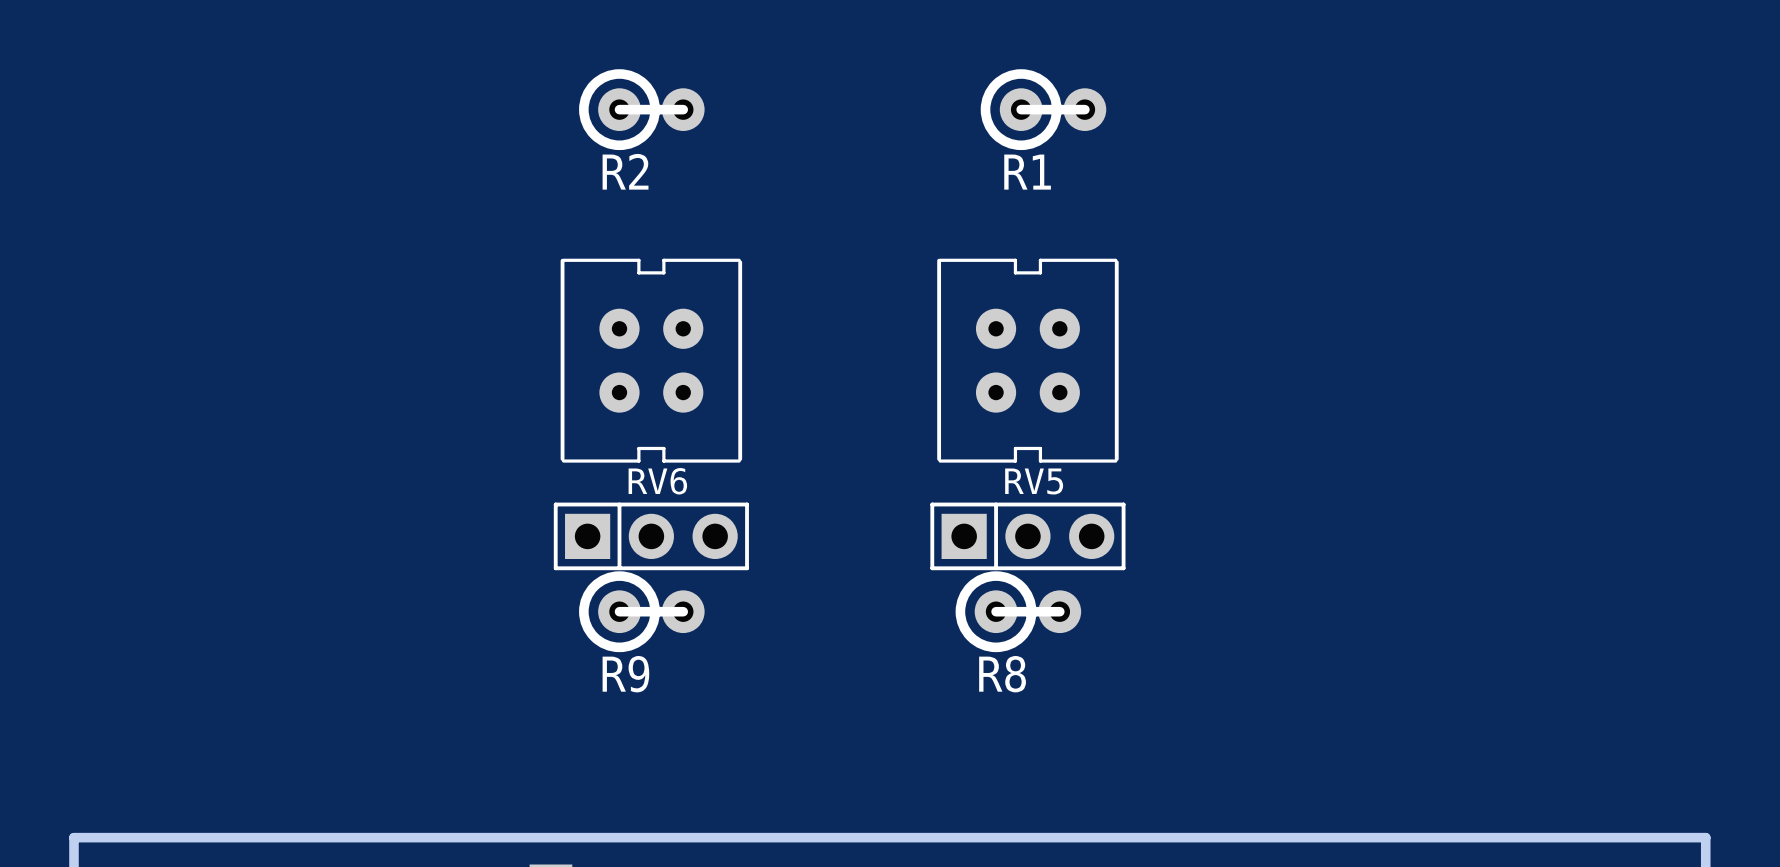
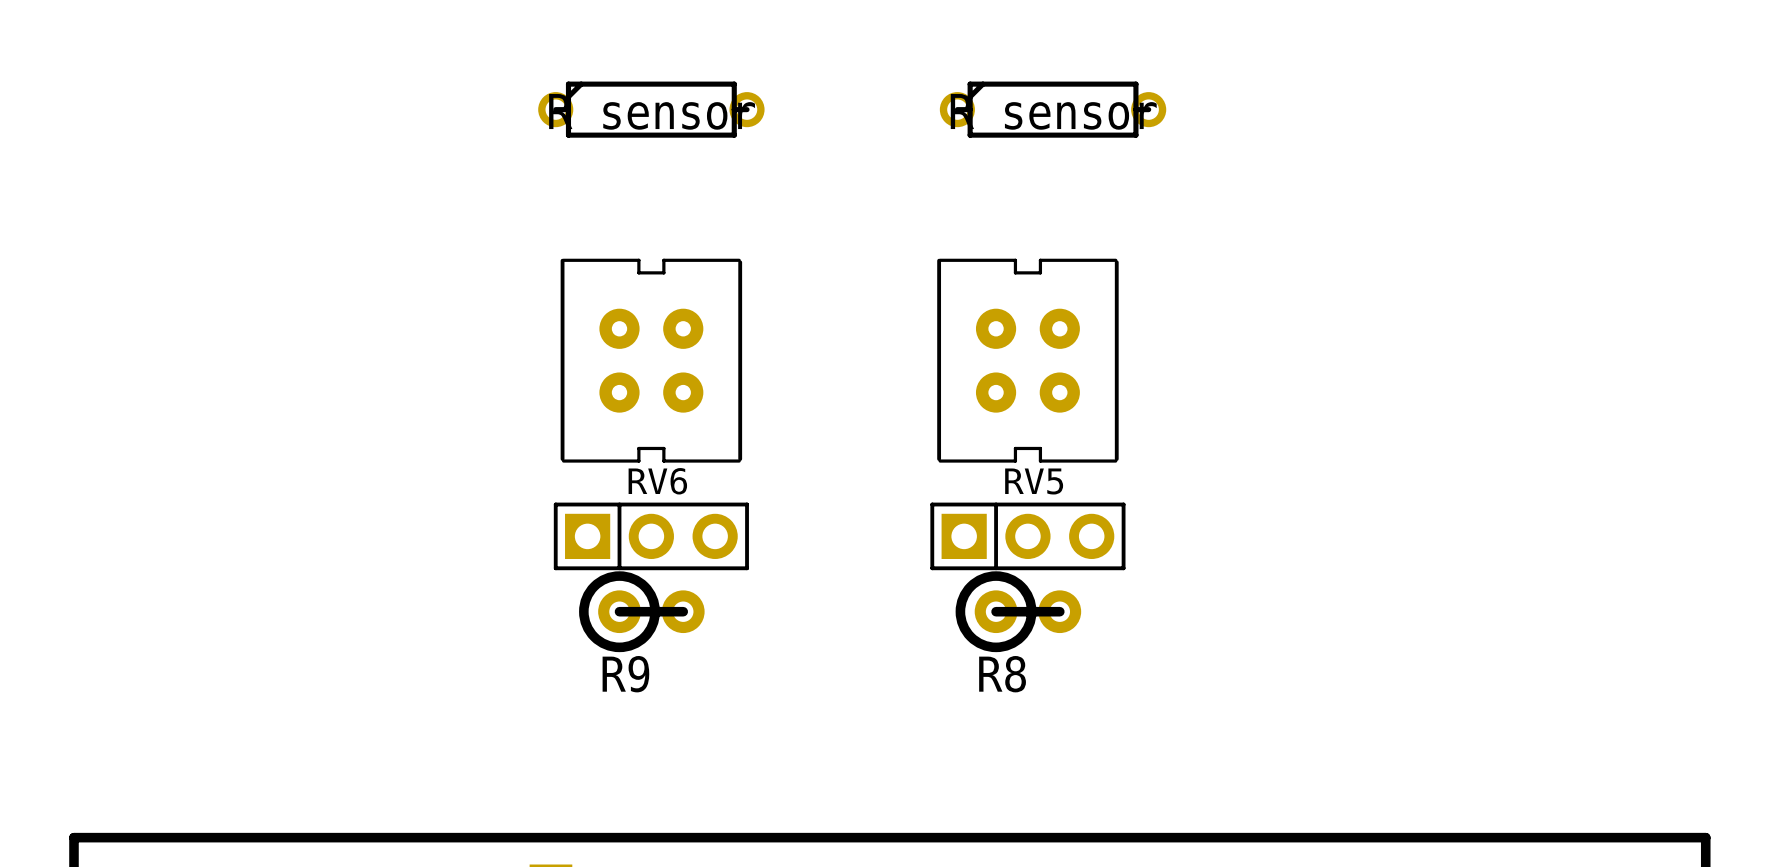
R2: (641, 109) -> none
part: none -> R sensor (651, 109)
R1: (1043, 109) -> none
part: none -> R sensor (1053, 109)

